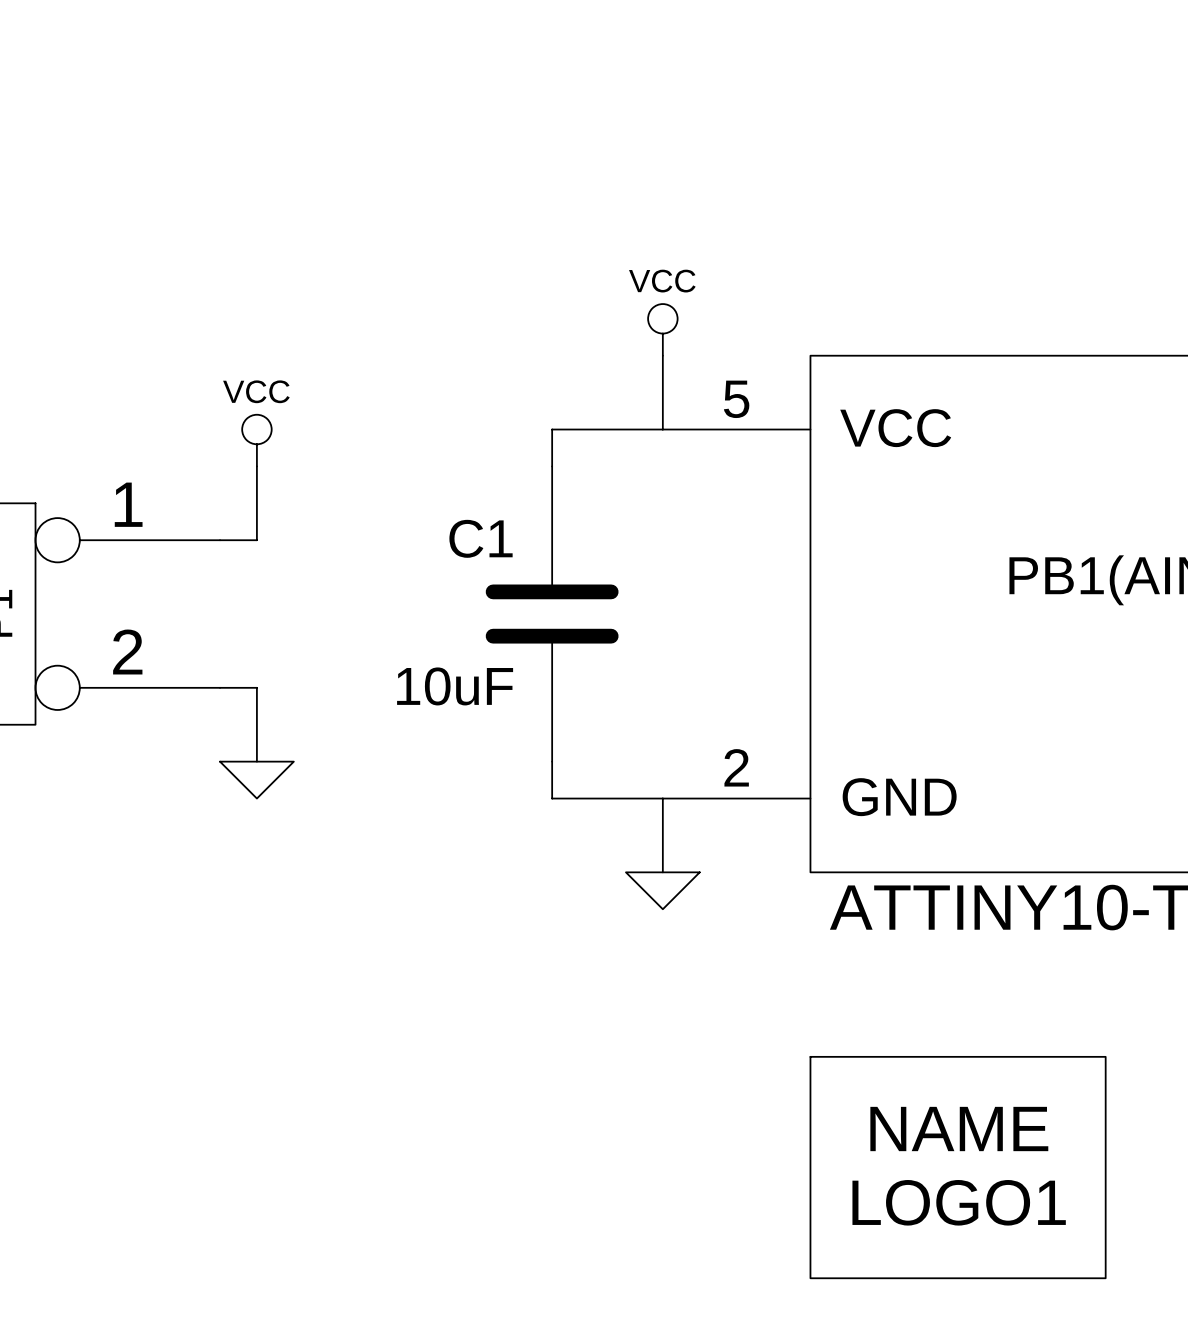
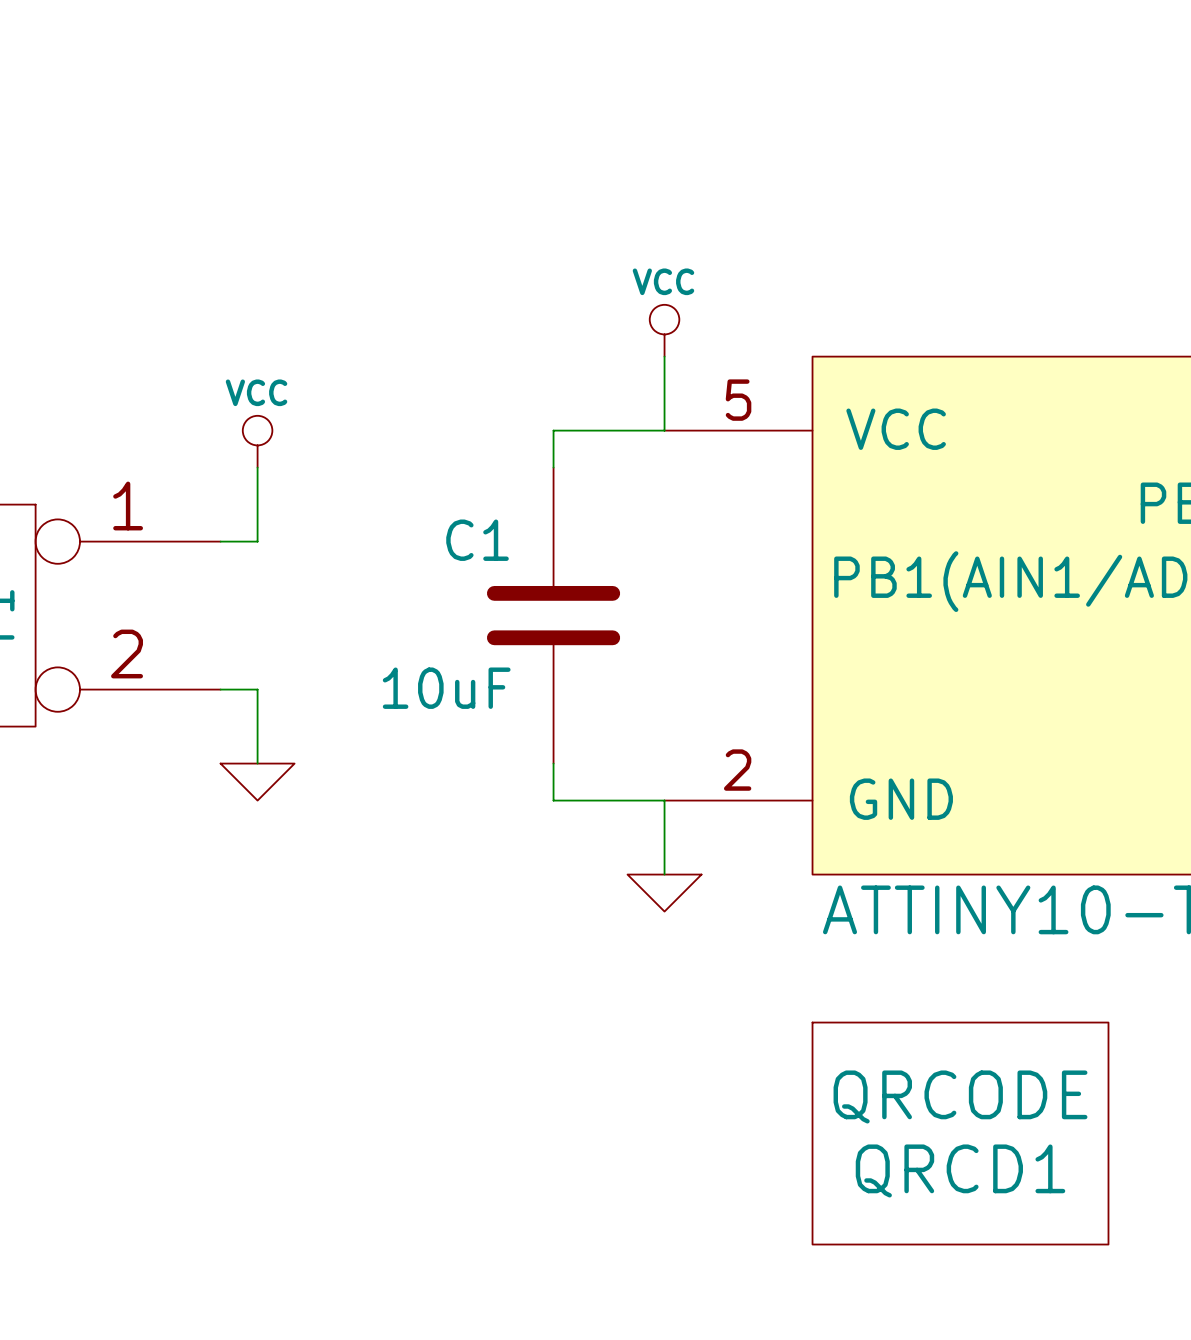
QRCD1: none -> QRCODE (960, 1133)
LOGO1: NAME (958, 1167) -> none

